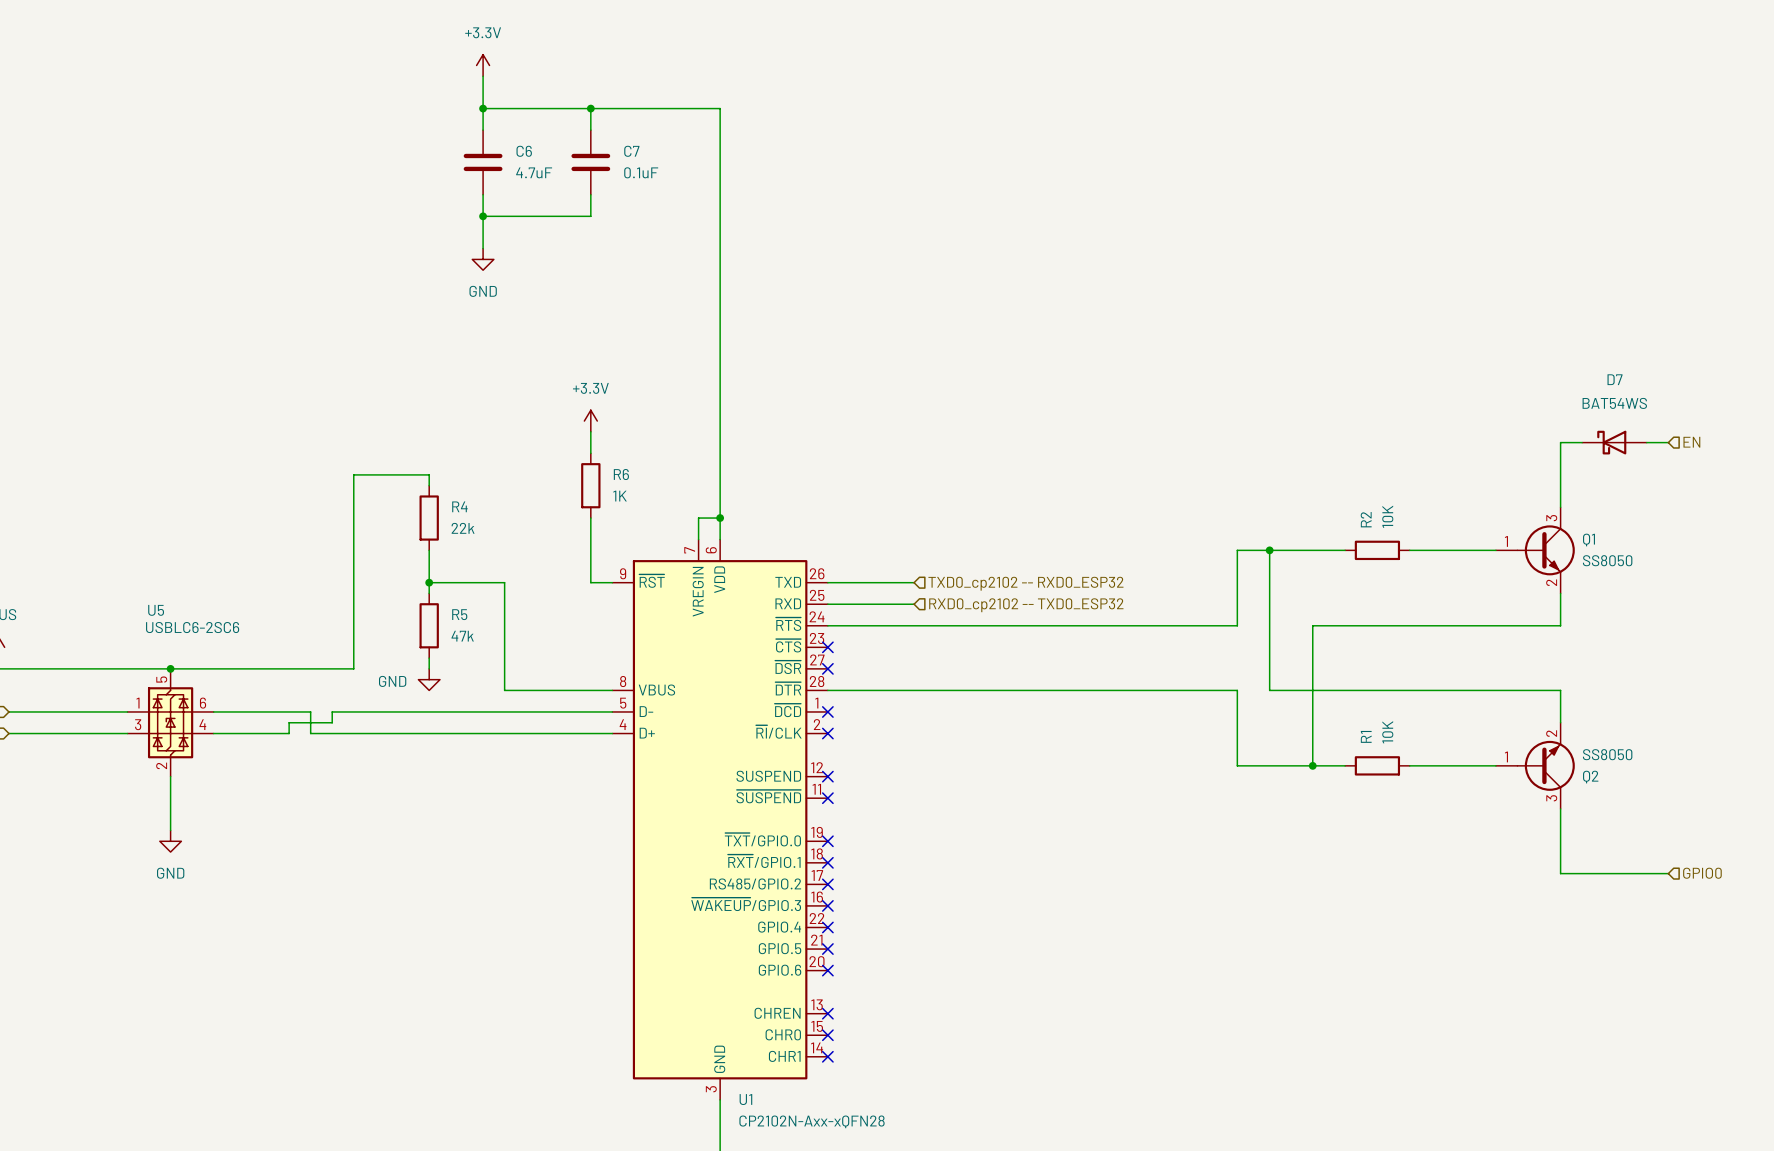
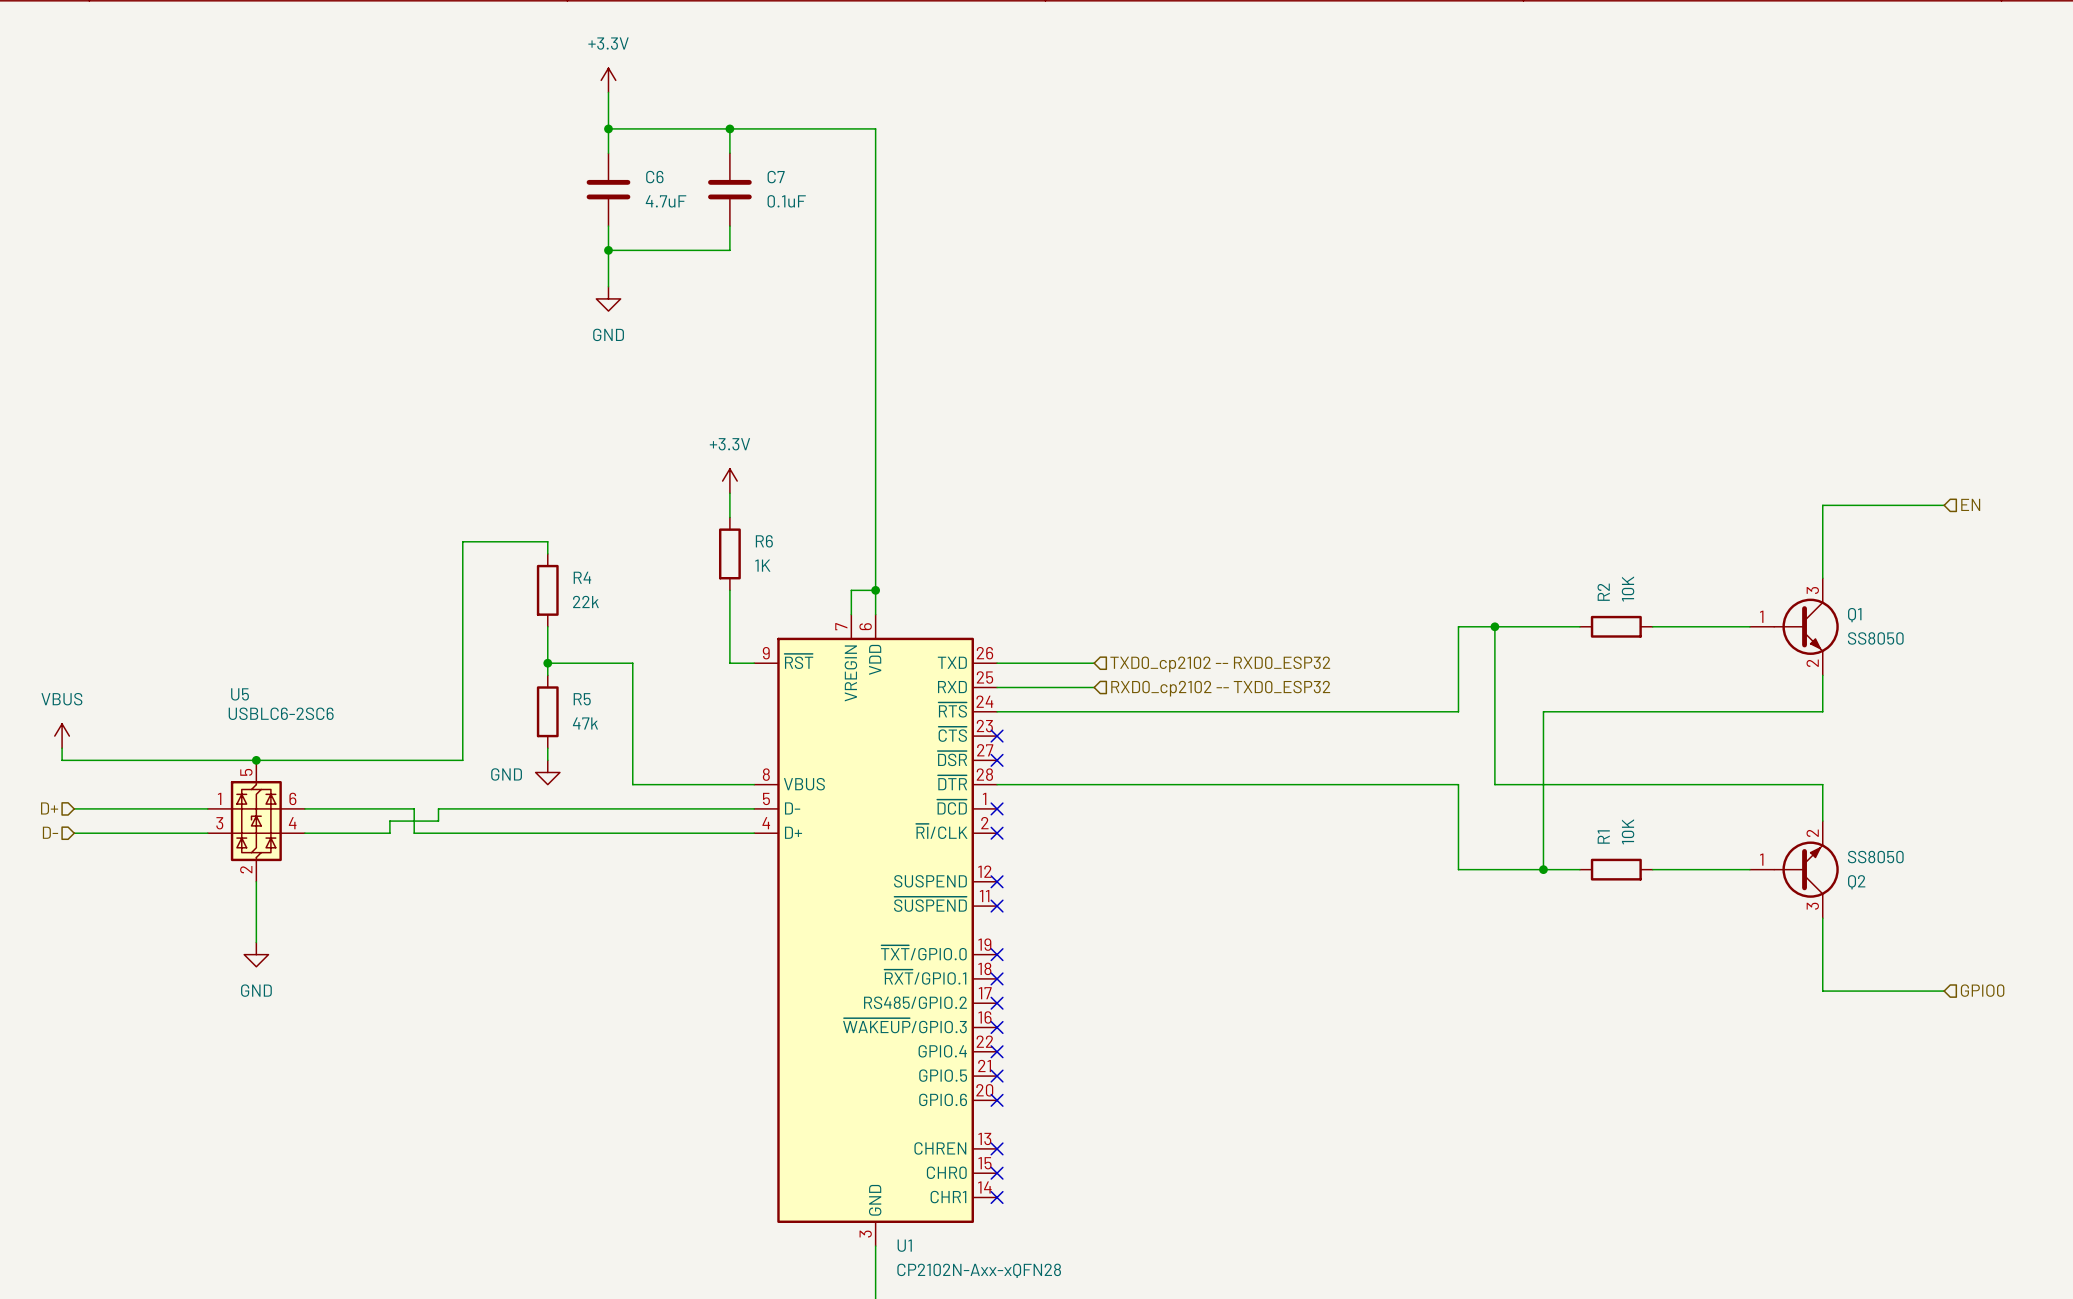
D7: BAT54WS (1614, 442) -> none

